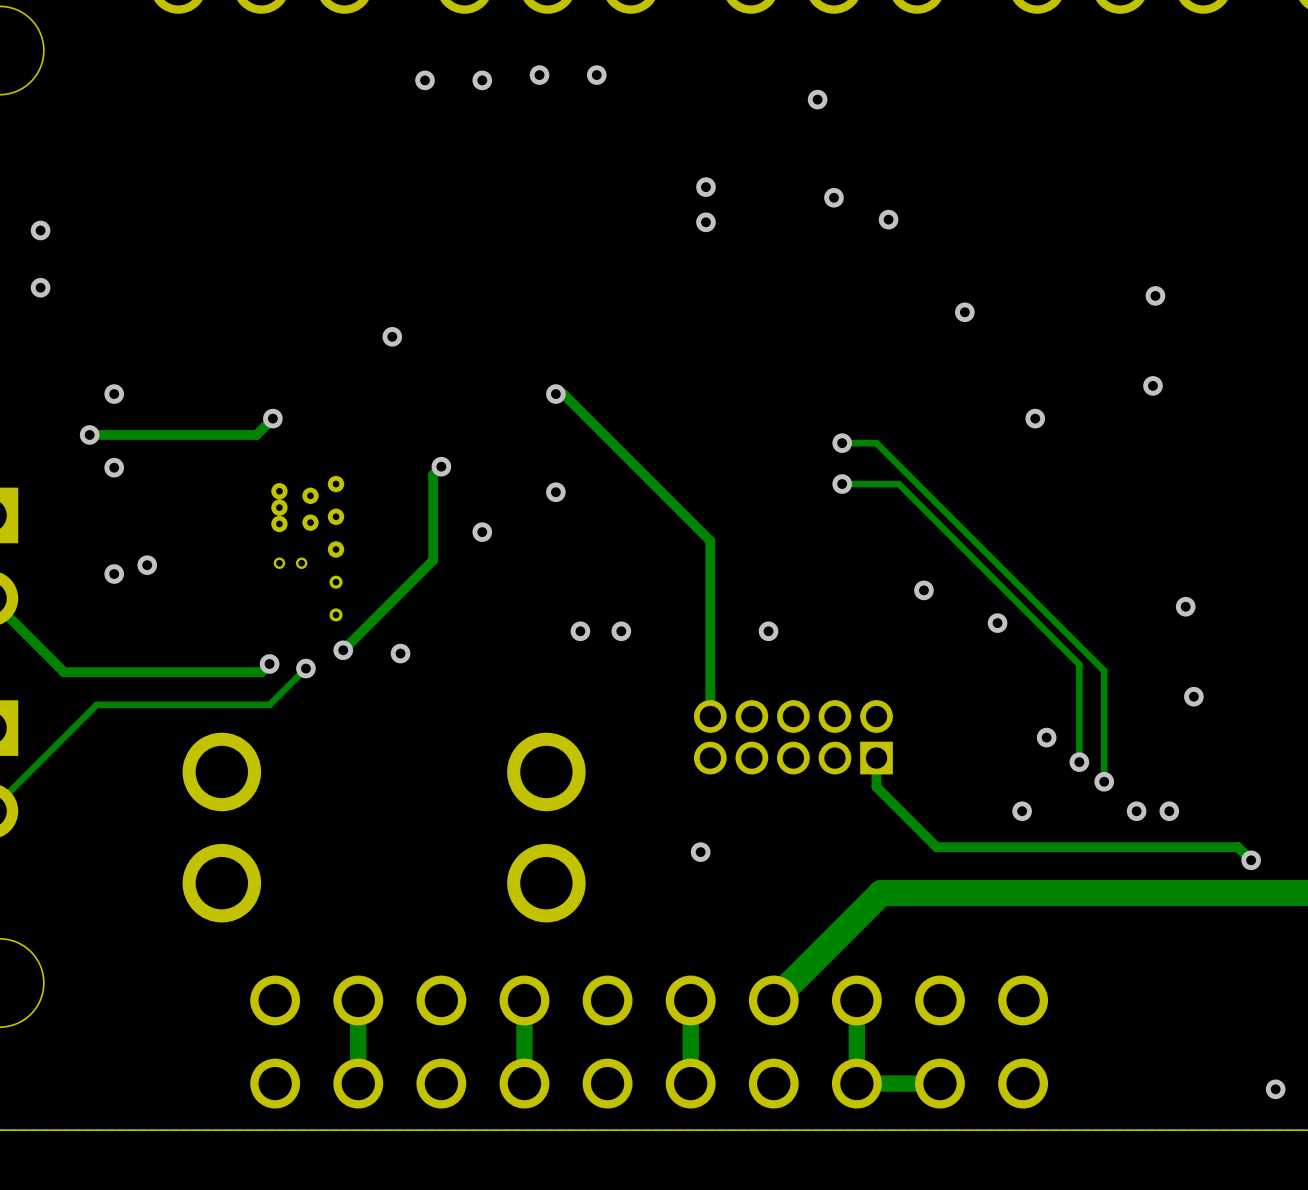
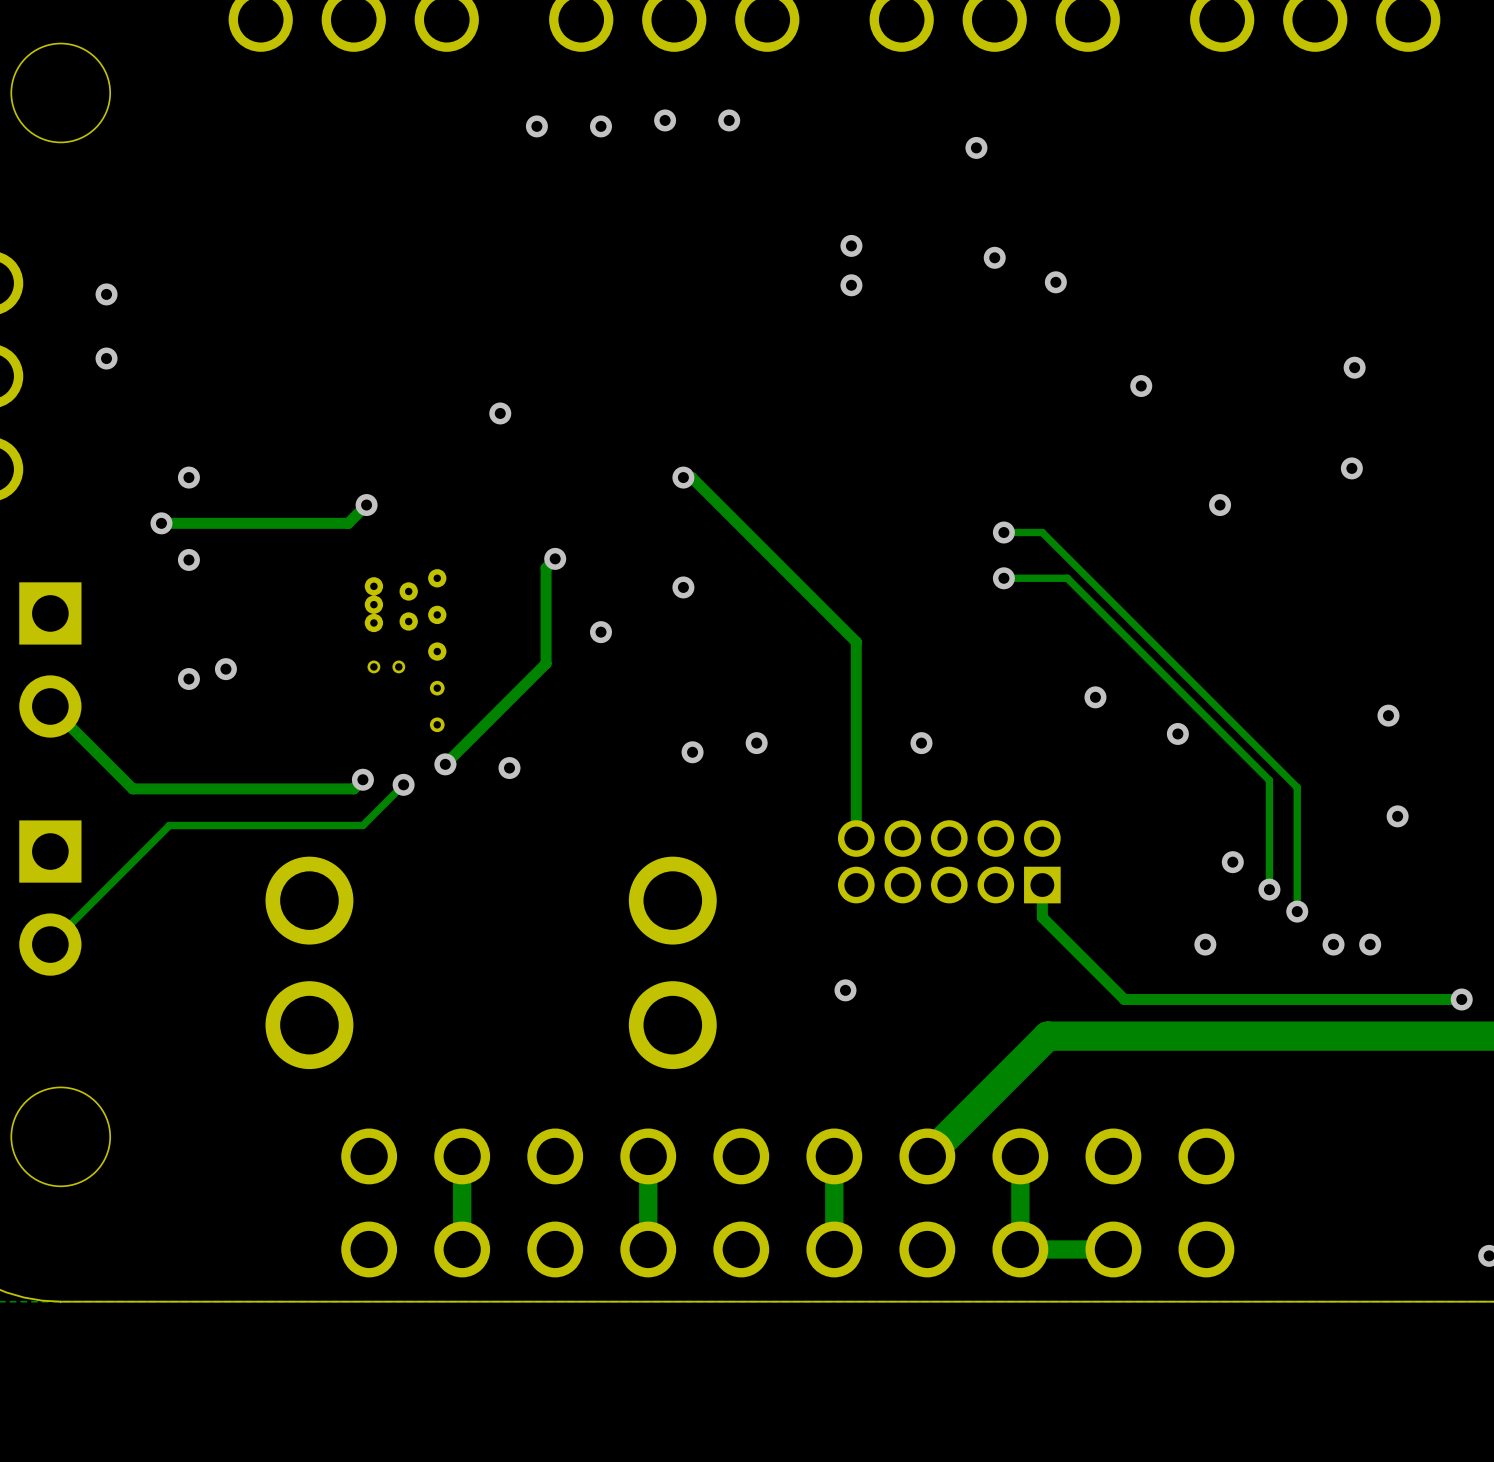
via position: (580, 631) -> (692, 752)
track: (936, 847) (1238, 847) (1251, 860) -> (1109, 984) (1124, 999) (1461, 999)

